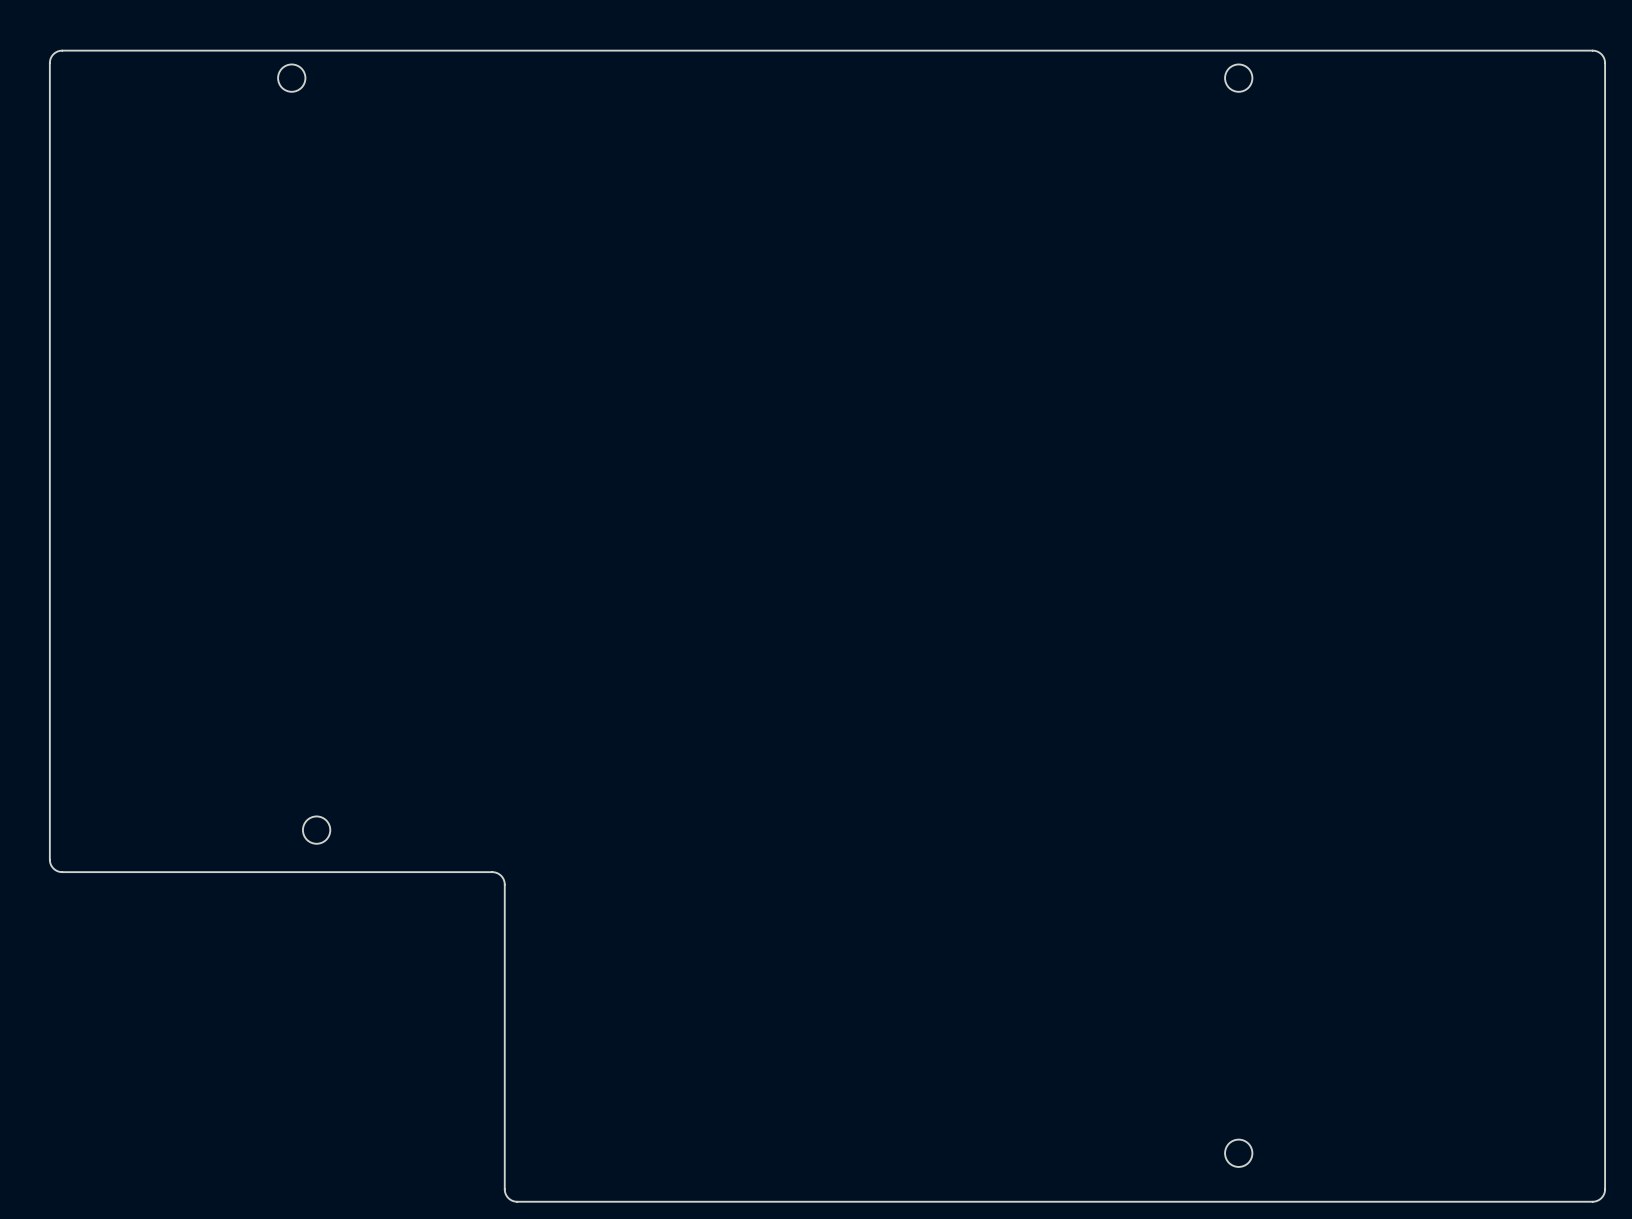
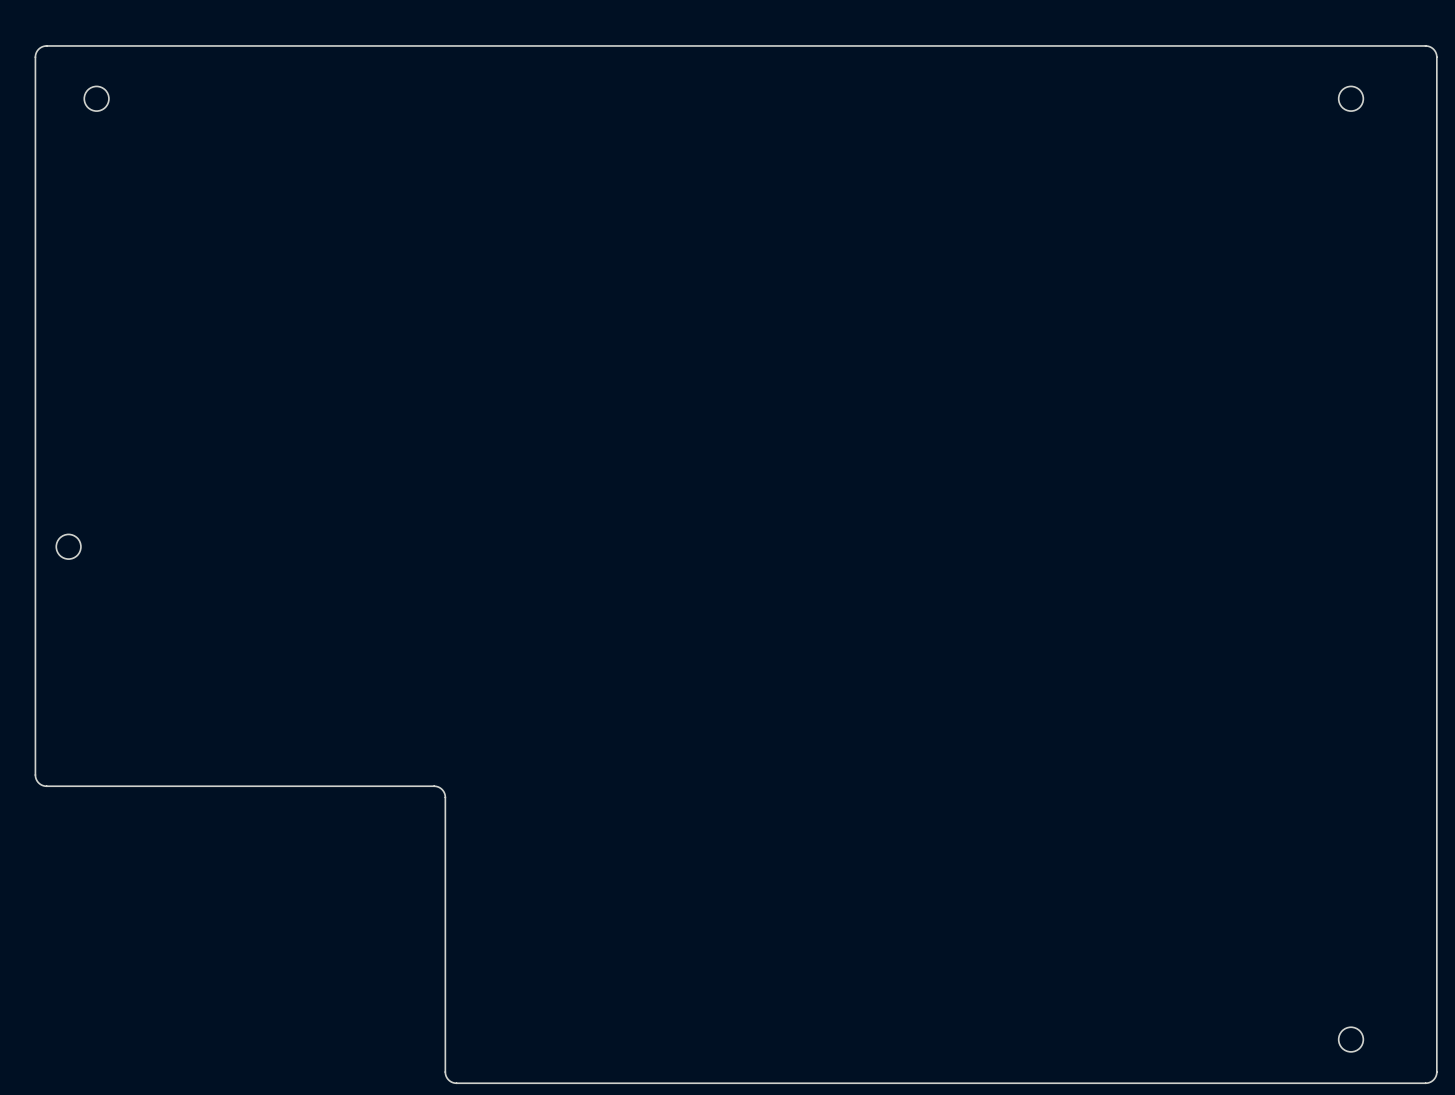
round board edge position: (291, 78) -> (96, 98)
round board edge position: (1238, 78) -> (1351, 98)
round board edge: none -> [55, 533, 82, 560]
round board edge: [302, 815, 332, 845] -> none
round board edge position: (1238, 1153) -> (1351, 1039)

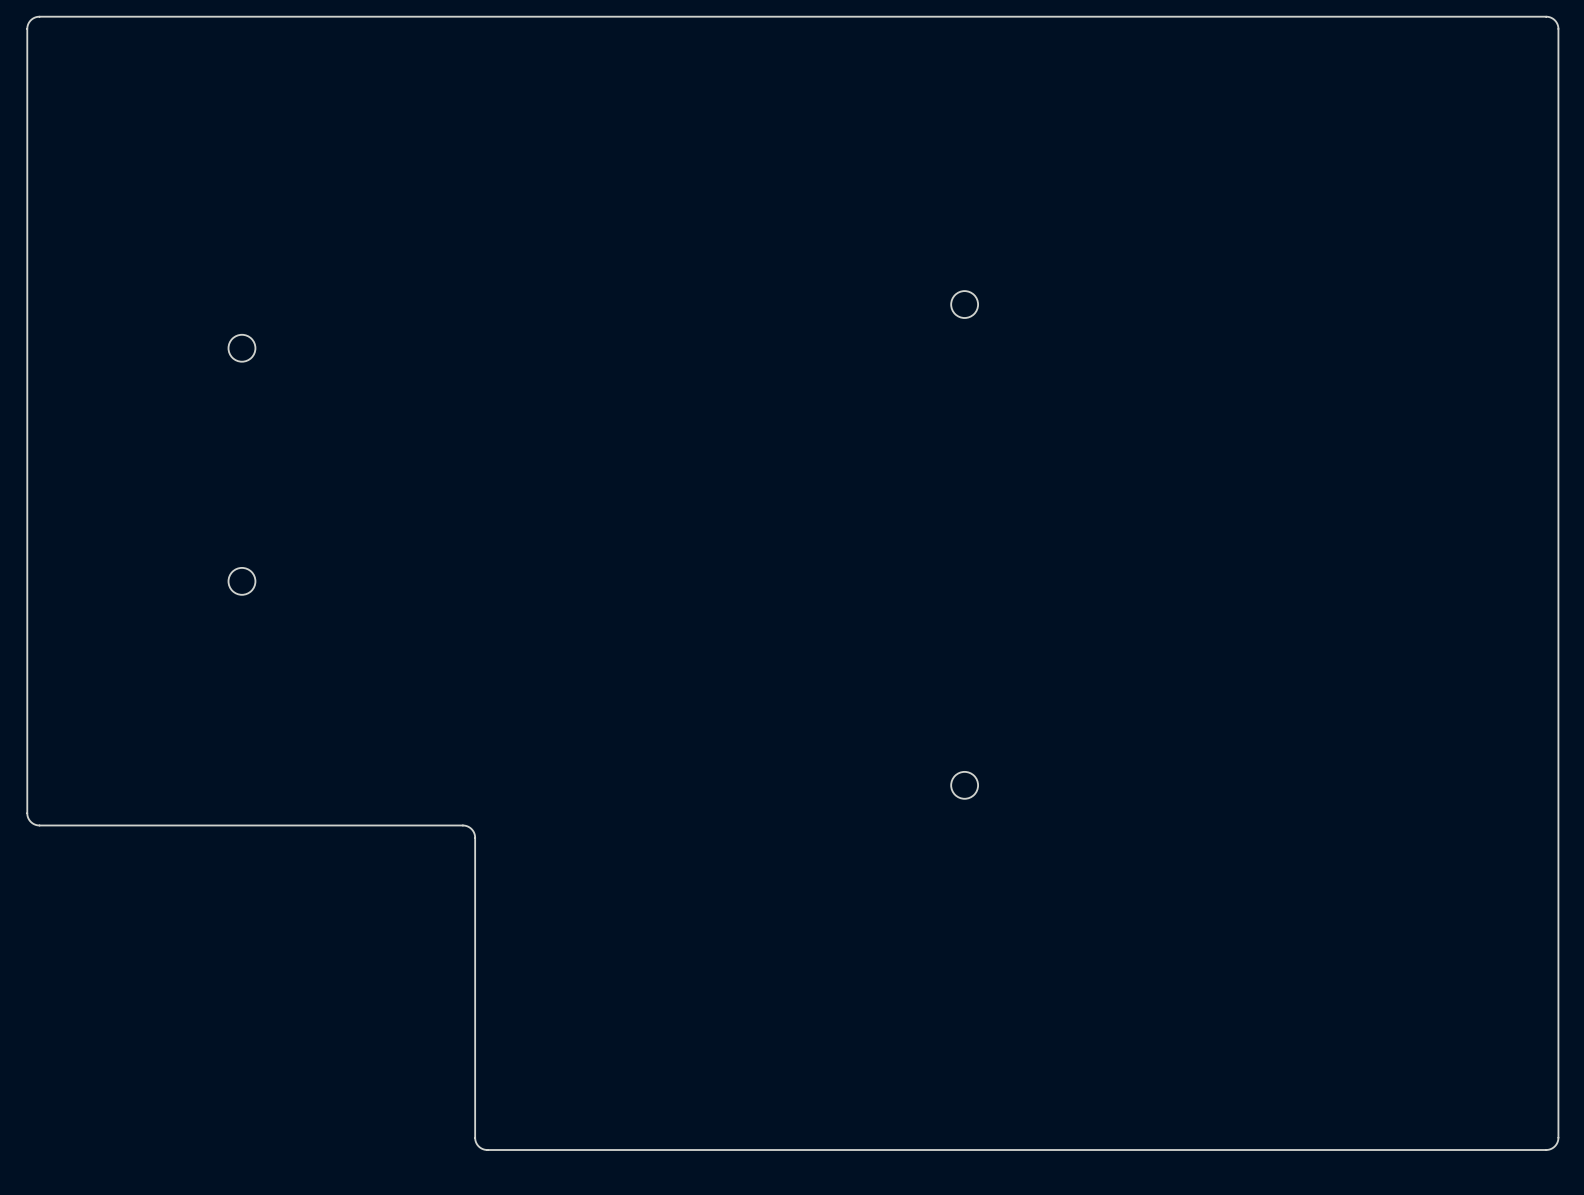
round board edge: [83, 85, 110, 112] -> none
round board edge: [1337, 85, 1365, 112] -> none
round board edge: none -> [950, 290, 980, 319]
round board edge: none -> [227, 333, 257, 363]
round board edge: [55, 533, 82, 560] -> none
round board edge: none -> [227, 566, 257, 596]
round board edge: none -> [950, 770, 980, 800]
round board edge: [1337, 1026, 1365, 1053] -> none

